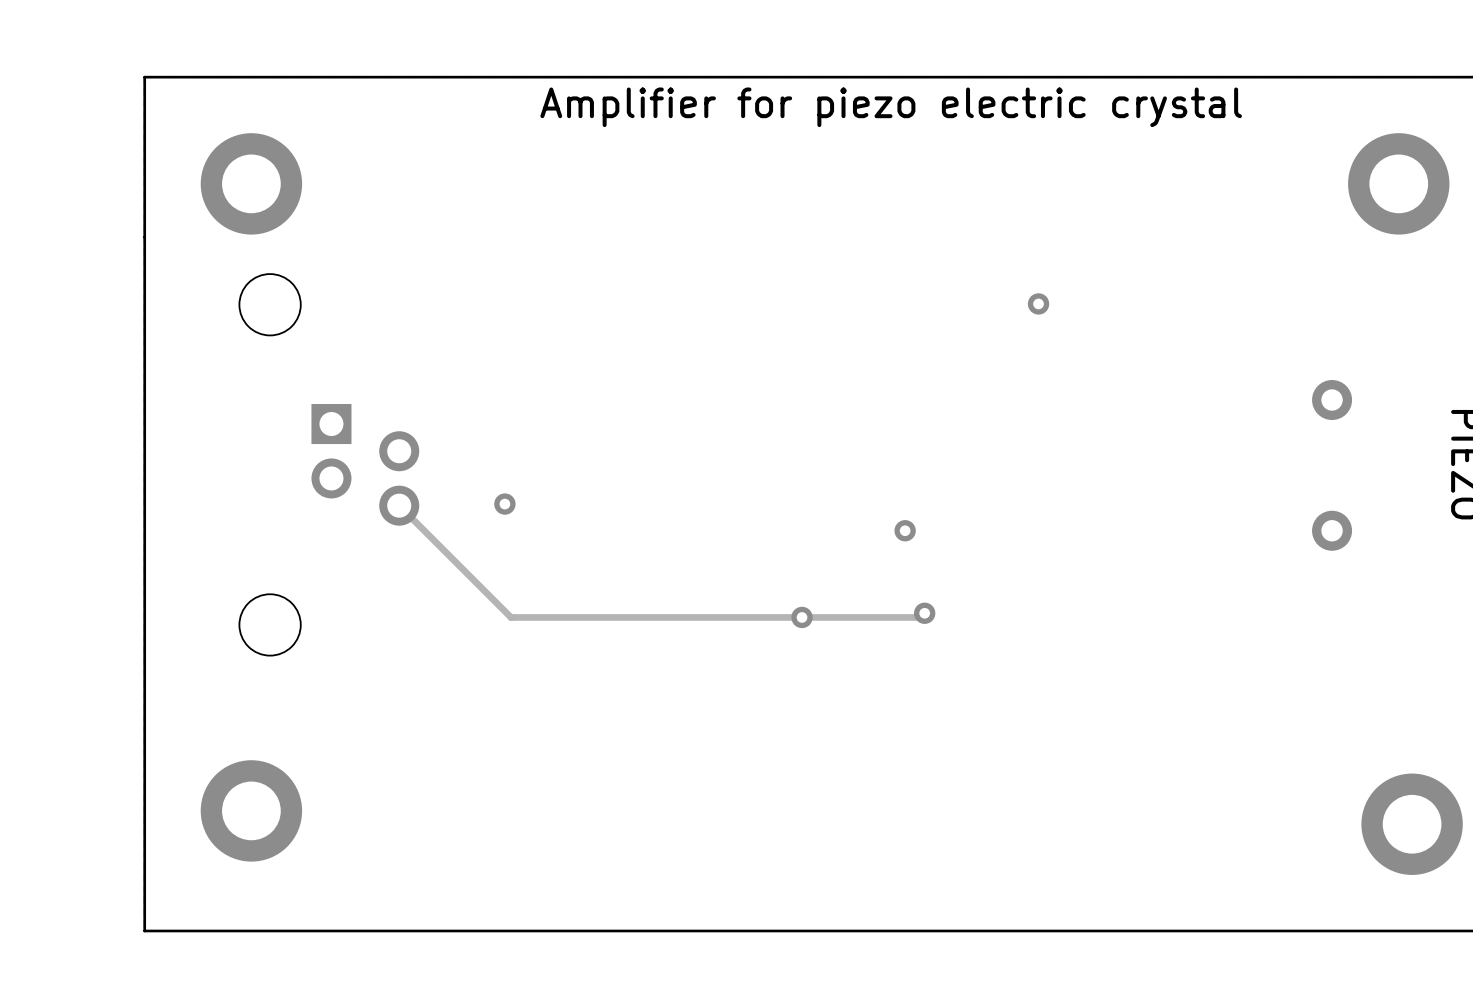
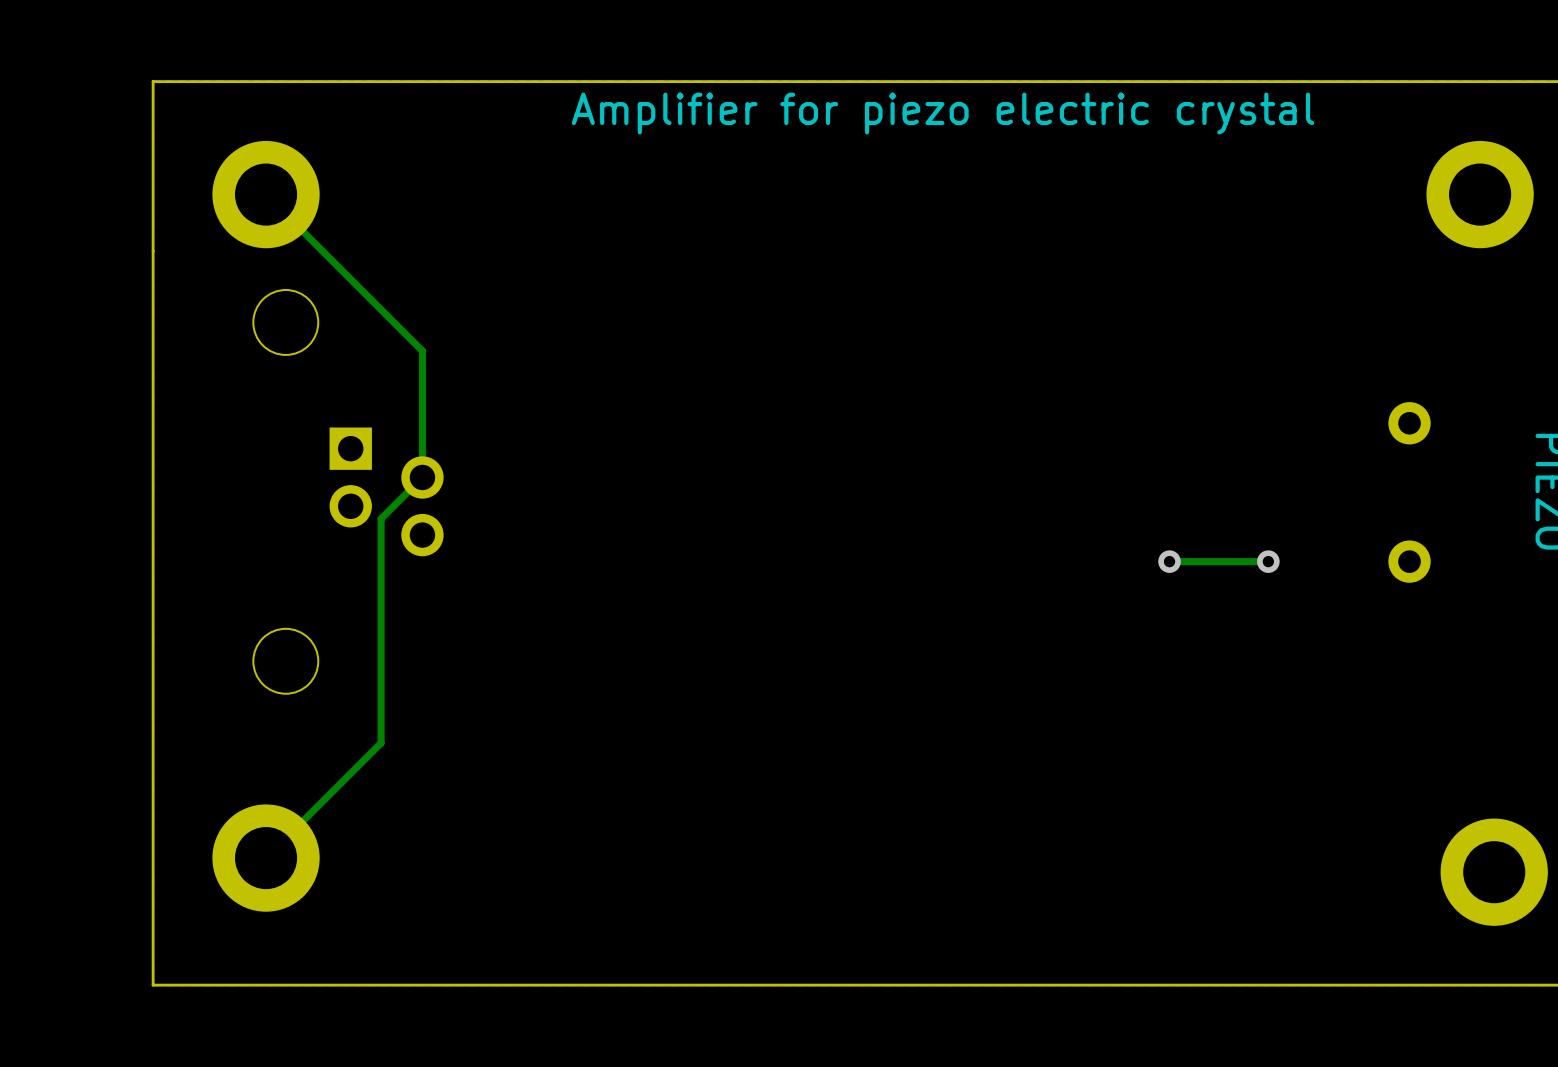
track: none -> (266, 194) (422, 350) (422, 477) (381, 518) (381, 743) (266, 858)
via: (1038, 303) -> none
via: (504, 504) -> none
track: (399, 505) (511, 617) (920, 617) (924, 613) -> none
via: (905, 530) -> none
via: none -> (1169, 561)
track: none -> (1268, 561) (1169, 561)
via: none -> (1268, 561)
via: (924, 613) -> none
via: (802, 617) -> none

